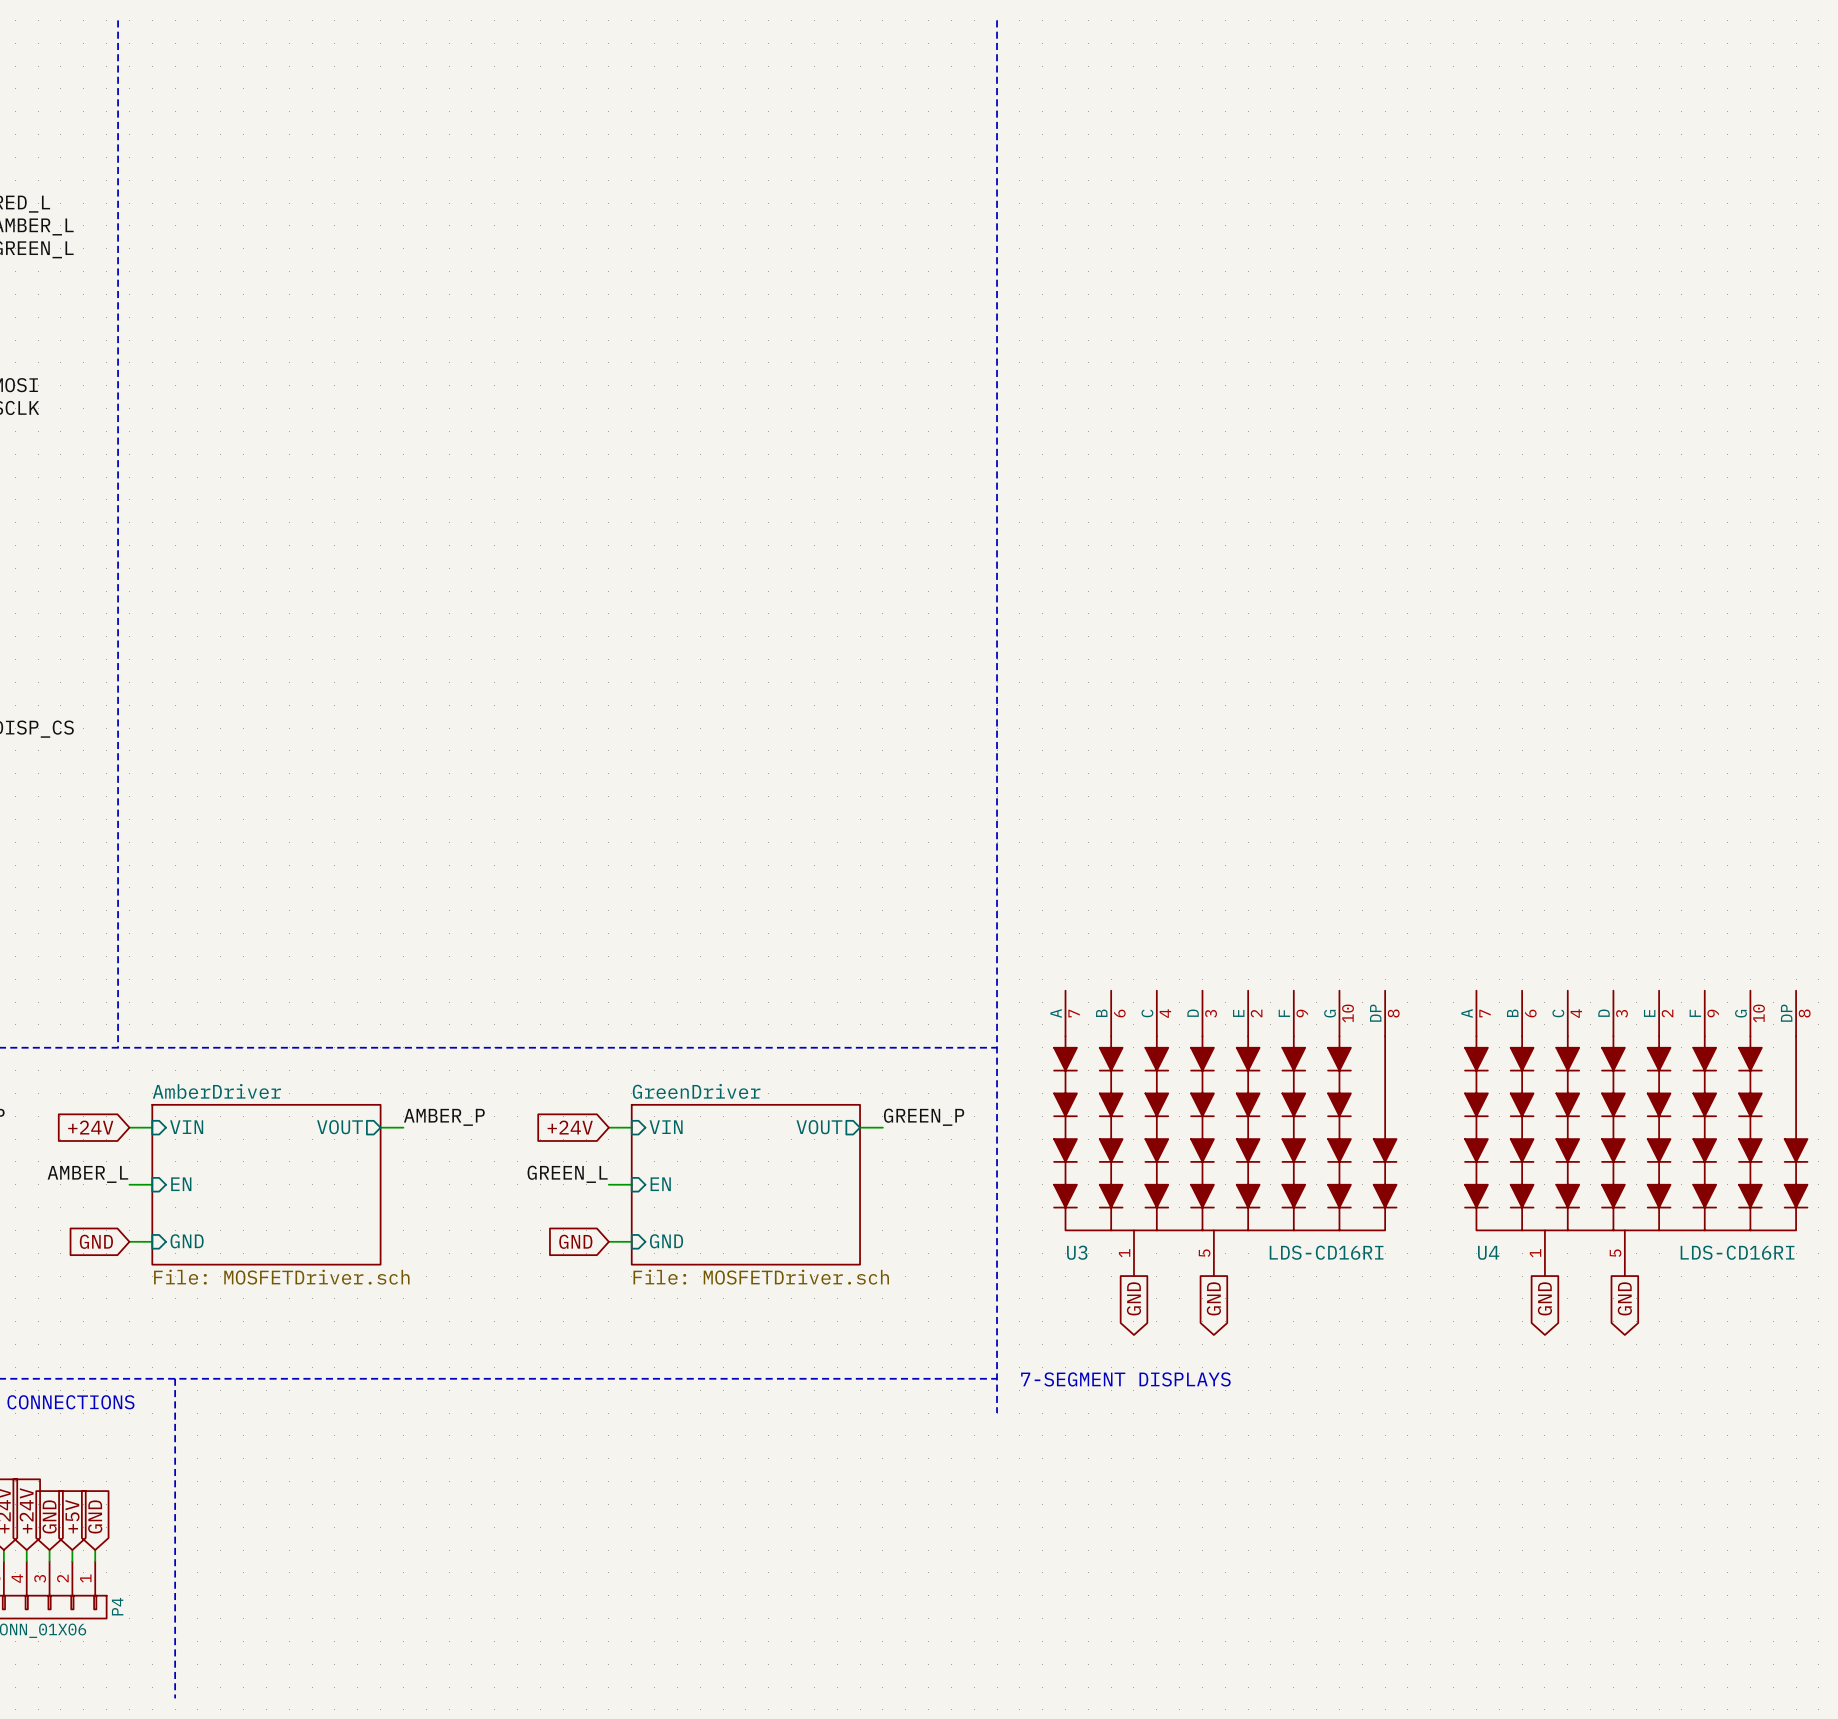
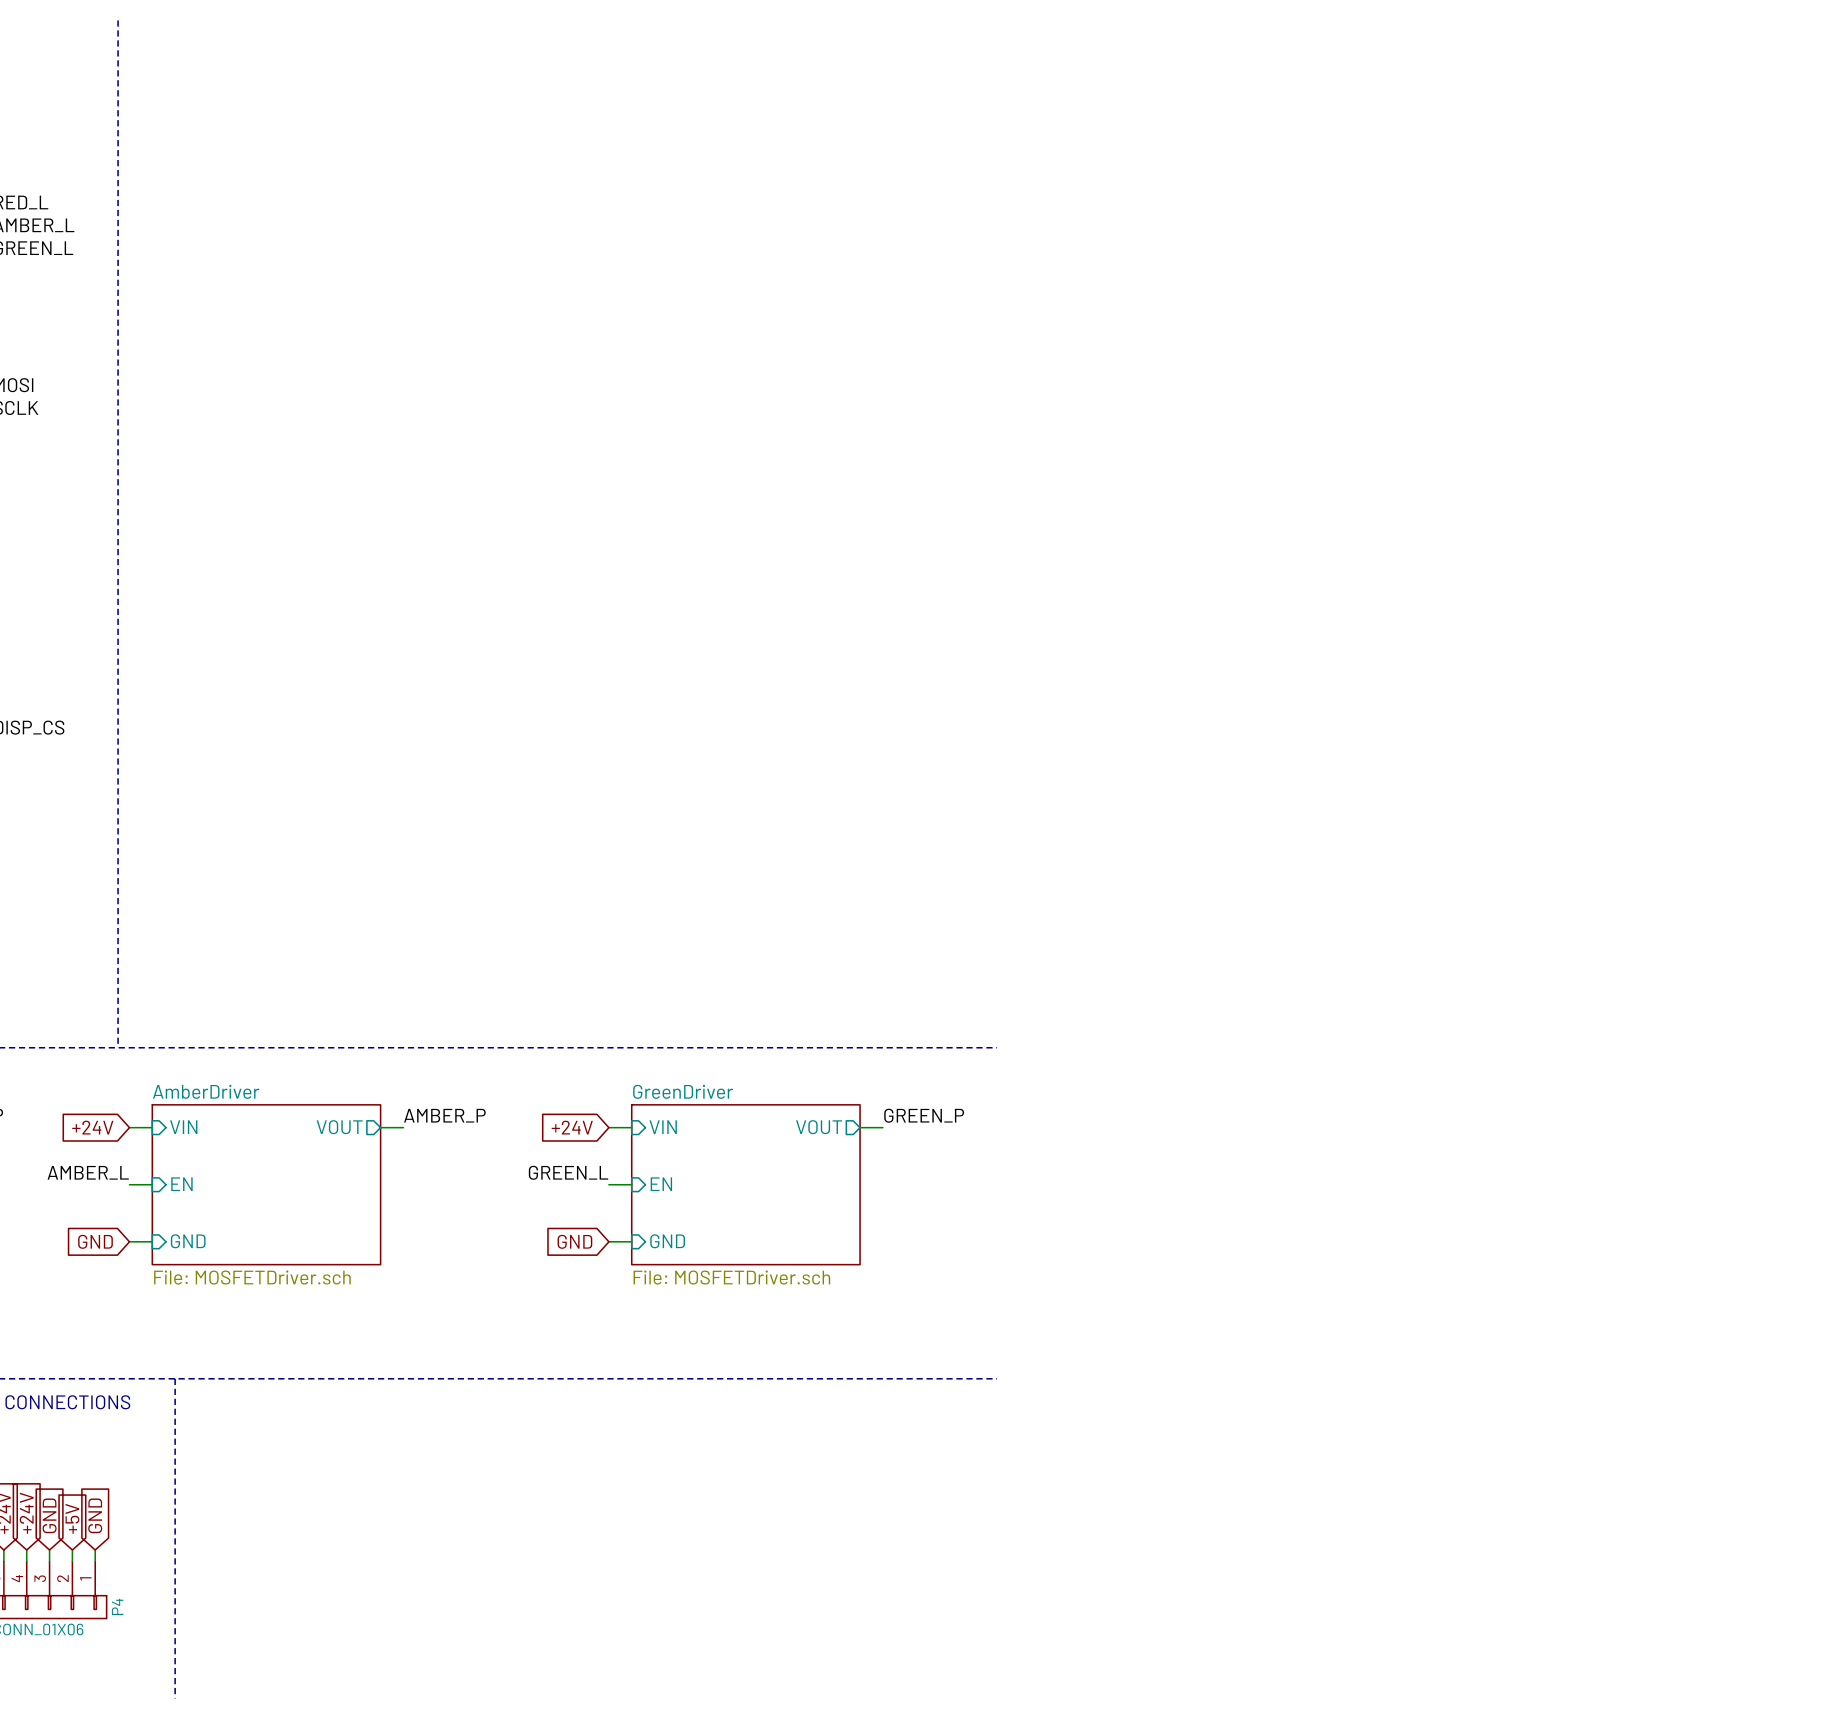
line: (997, 20) (997, 1413) -> none
U3: LDS-CD16RI (1225, 1133) -> none
U4: LDS-CD16RI (1636, 1133) -> none
global label: GND (1133, 1298) -> none
global label: GND (1213, 1298) -> none
global label: GND (1544, 1298) -> none
global label: GND (1624, 1298) -> none
text: 7-SEGMENT DISPLAYS (1125, 1379) -> none

